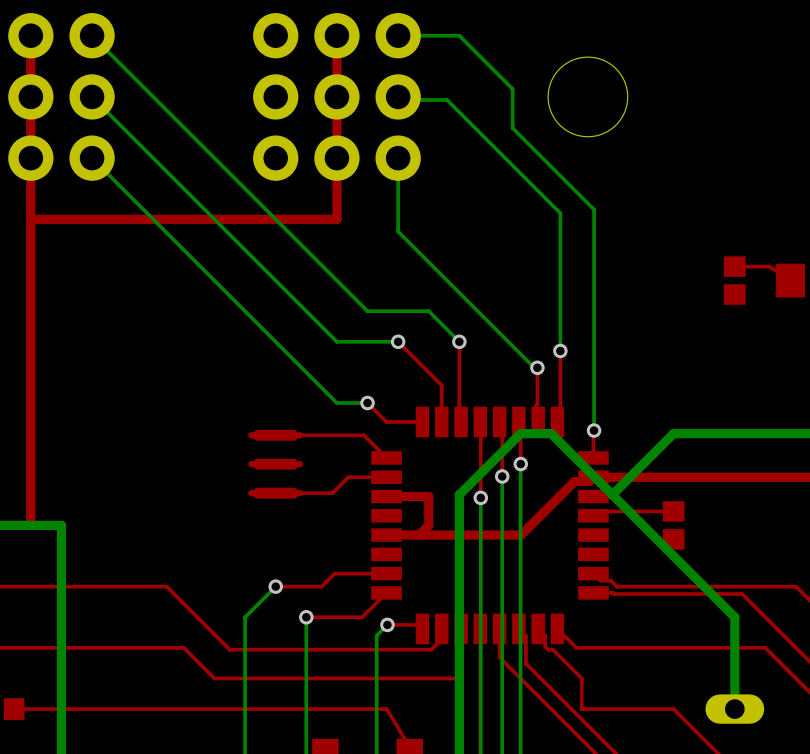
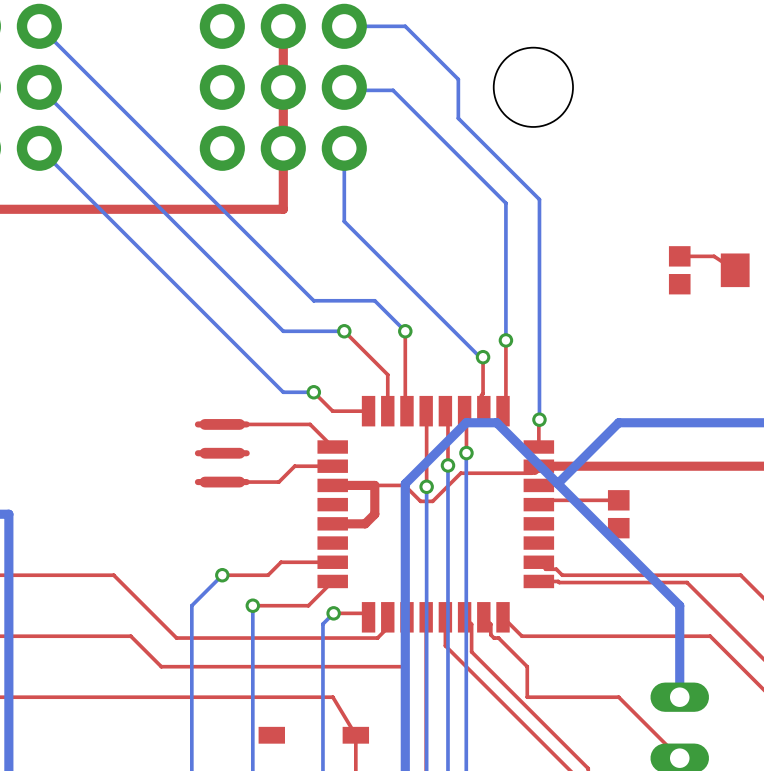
top track: (589, 481) (574, 481) (521, 535) (419, 535) -> (534, 470) (531, 473) (460, 473) (432, 501) (420, 501) (404, 485) (374, 485)

